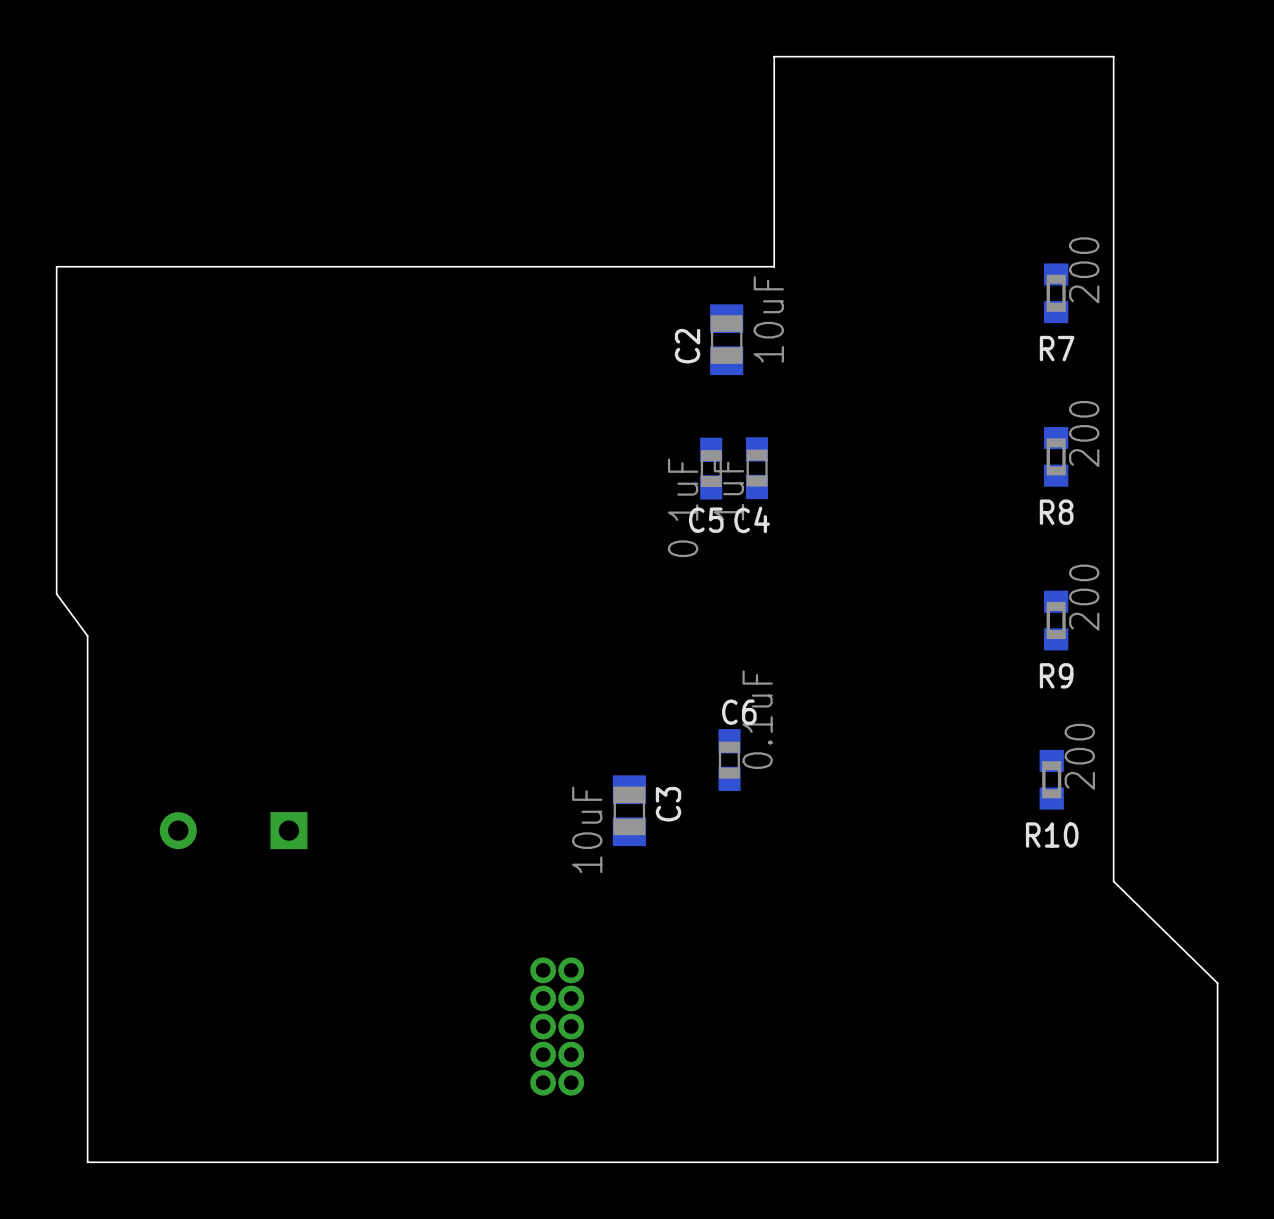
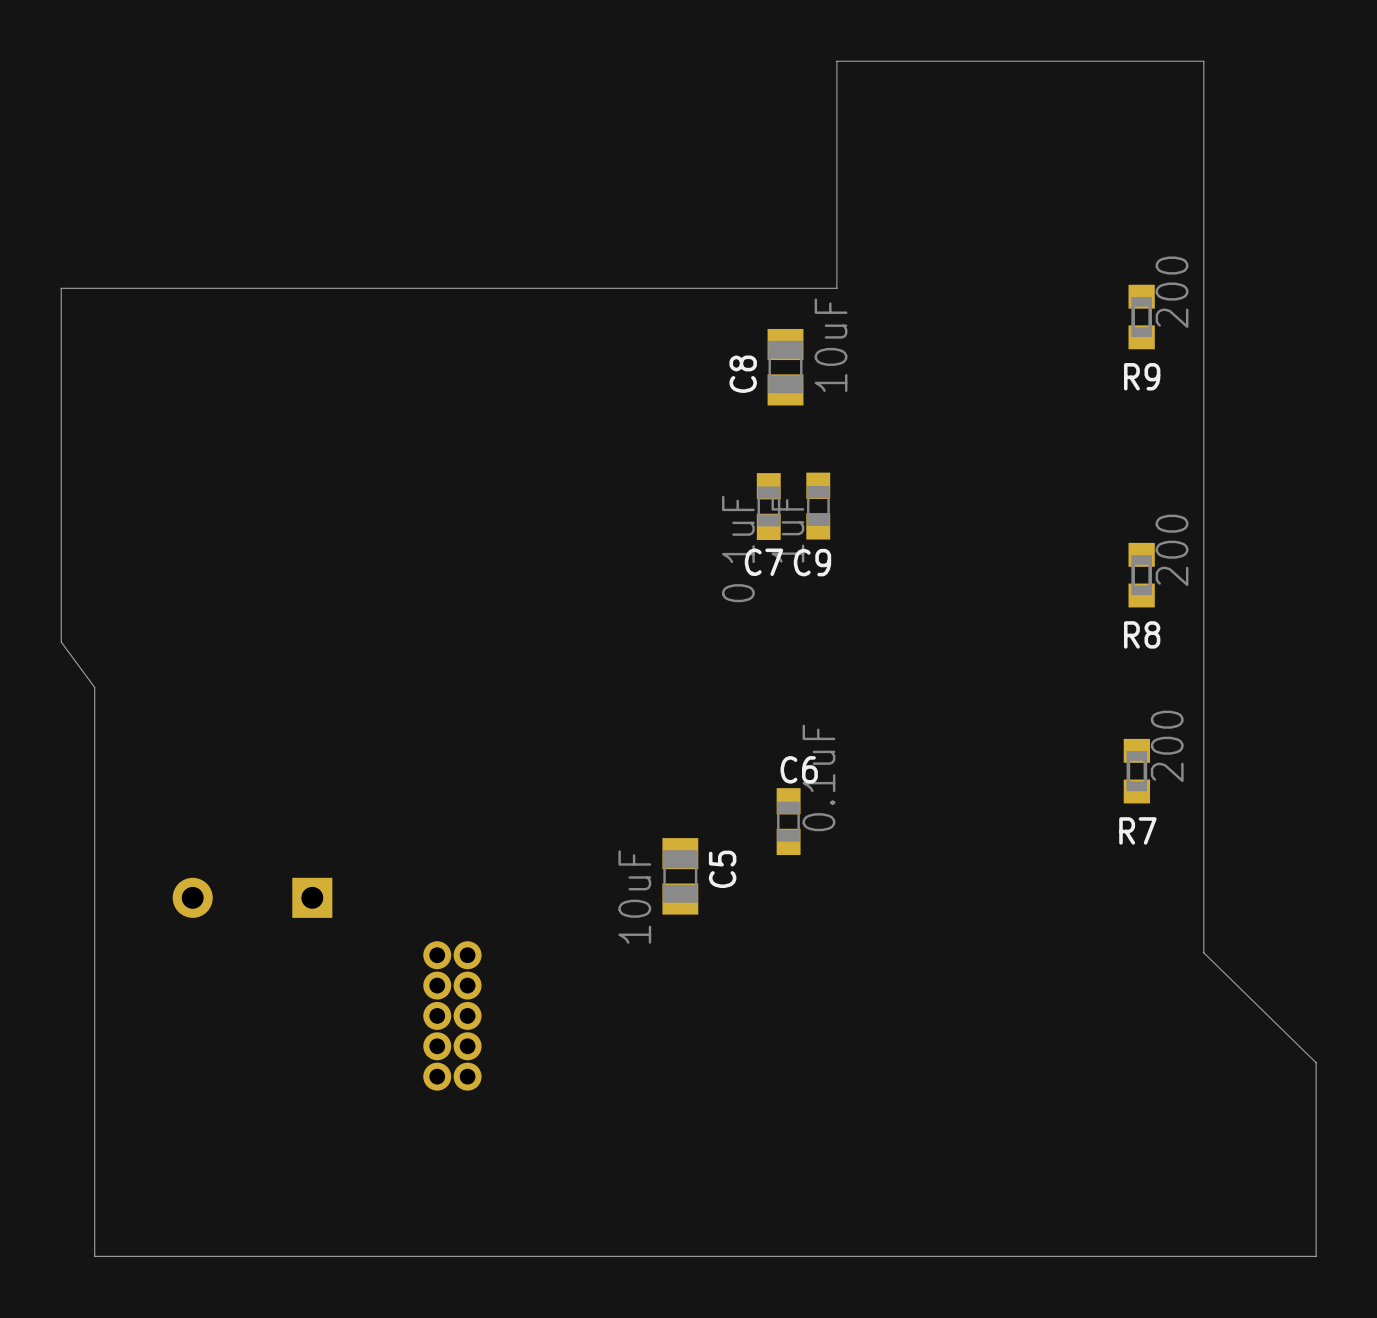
C2 name: C2 (687, 346) -> C8 (743, 374)
R7 name: R7 (1057, 348) -> R9 (1142, 376)
R8 position: (1056, 456) -> (1141, 575)
C4 name: C4 (752, 519) -> C9 (812, 562)
C5 name: C5 (706, 520) -> C7 (763, 562)
R9: 200 (1056, 620) -> none
R7: none -> 200 (1136, 771)
R10: 200 (1051, 779) -> none
C3 name: C3 (668, 804) -> C5 (722, 869)
part position: (557, 1026) -> (452, 1015)

